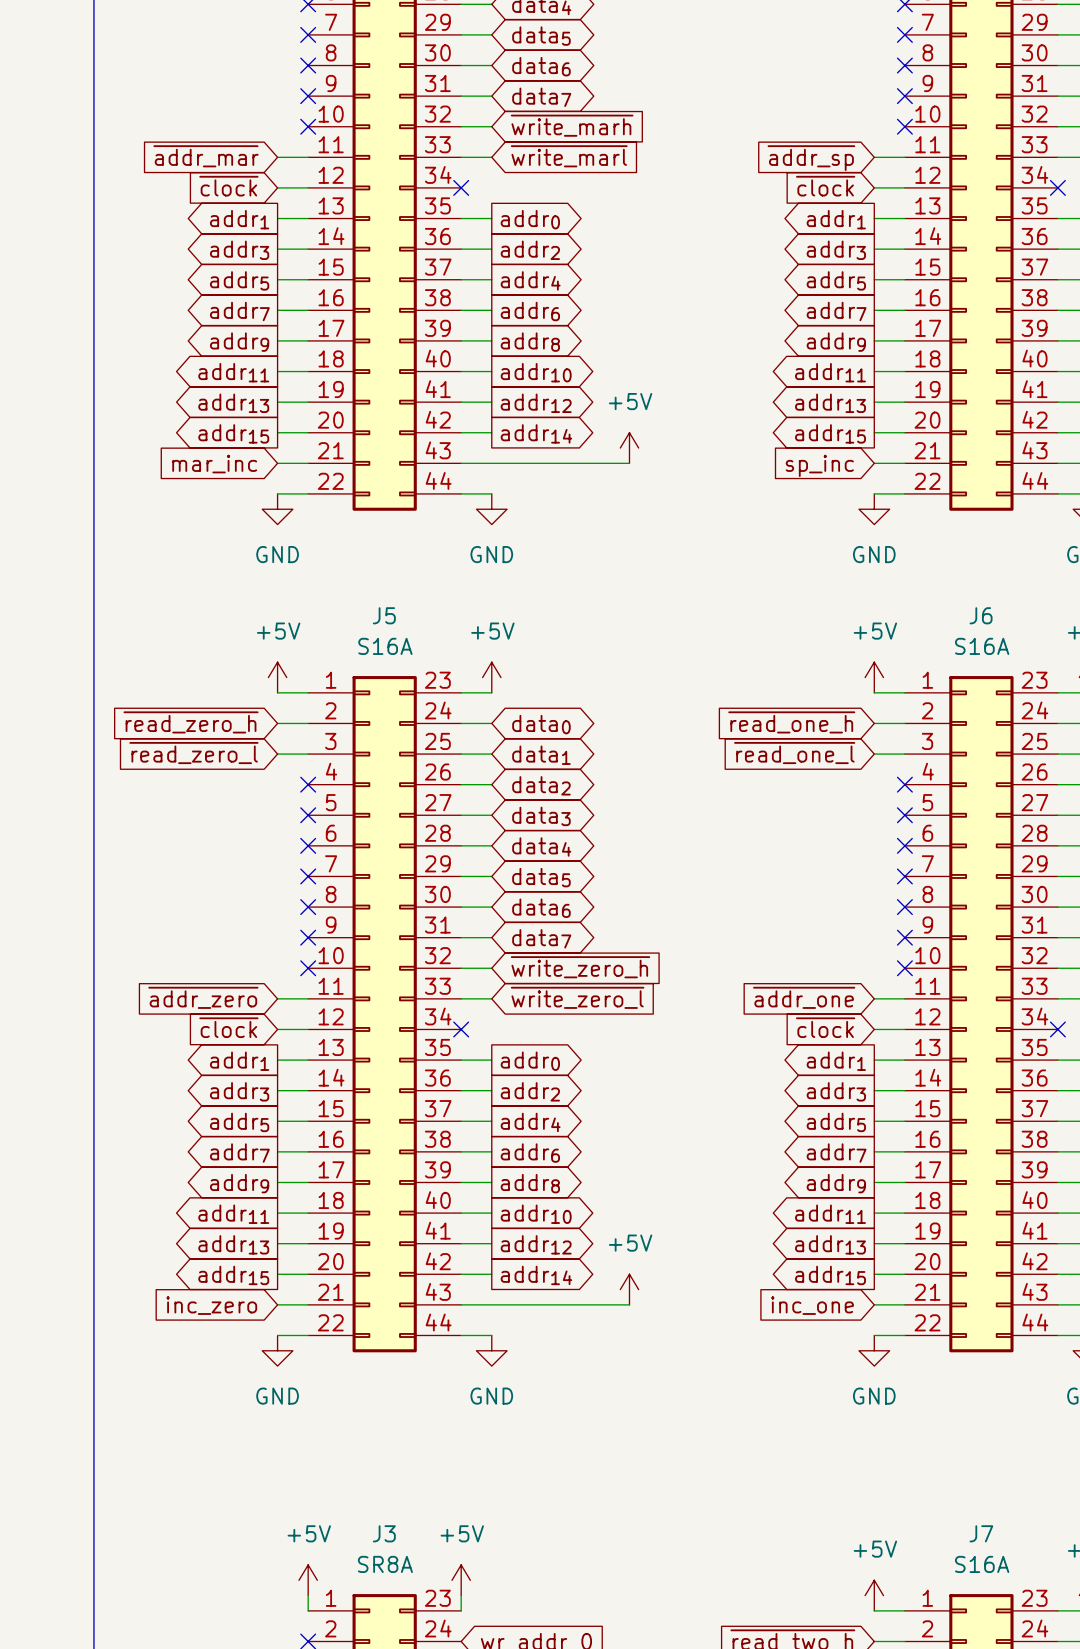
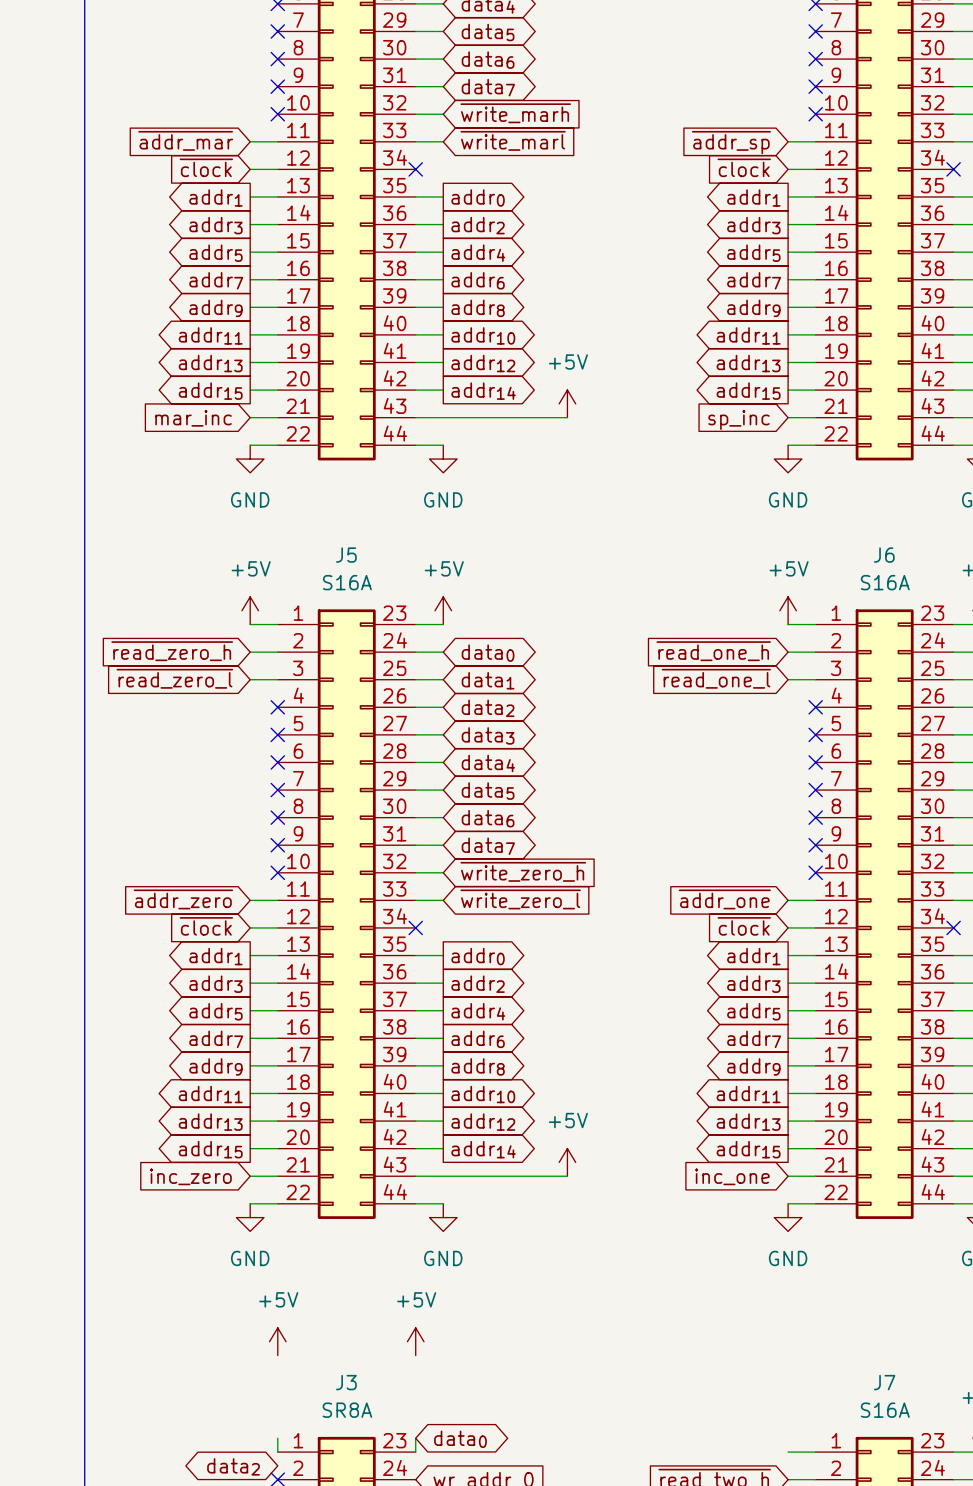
power symbol: none -> +5V (277, 1341)
power symbol: none -> +5V (415, 1341)
power symbol: +5V (308, 1580) -> none
power symbol: +5V (461, 1580) -> none
power symbol: +5V (874, 1595) -> none
global label: none -> data0 (460, 1439)
global label: none -> data2 (233, 1466)

